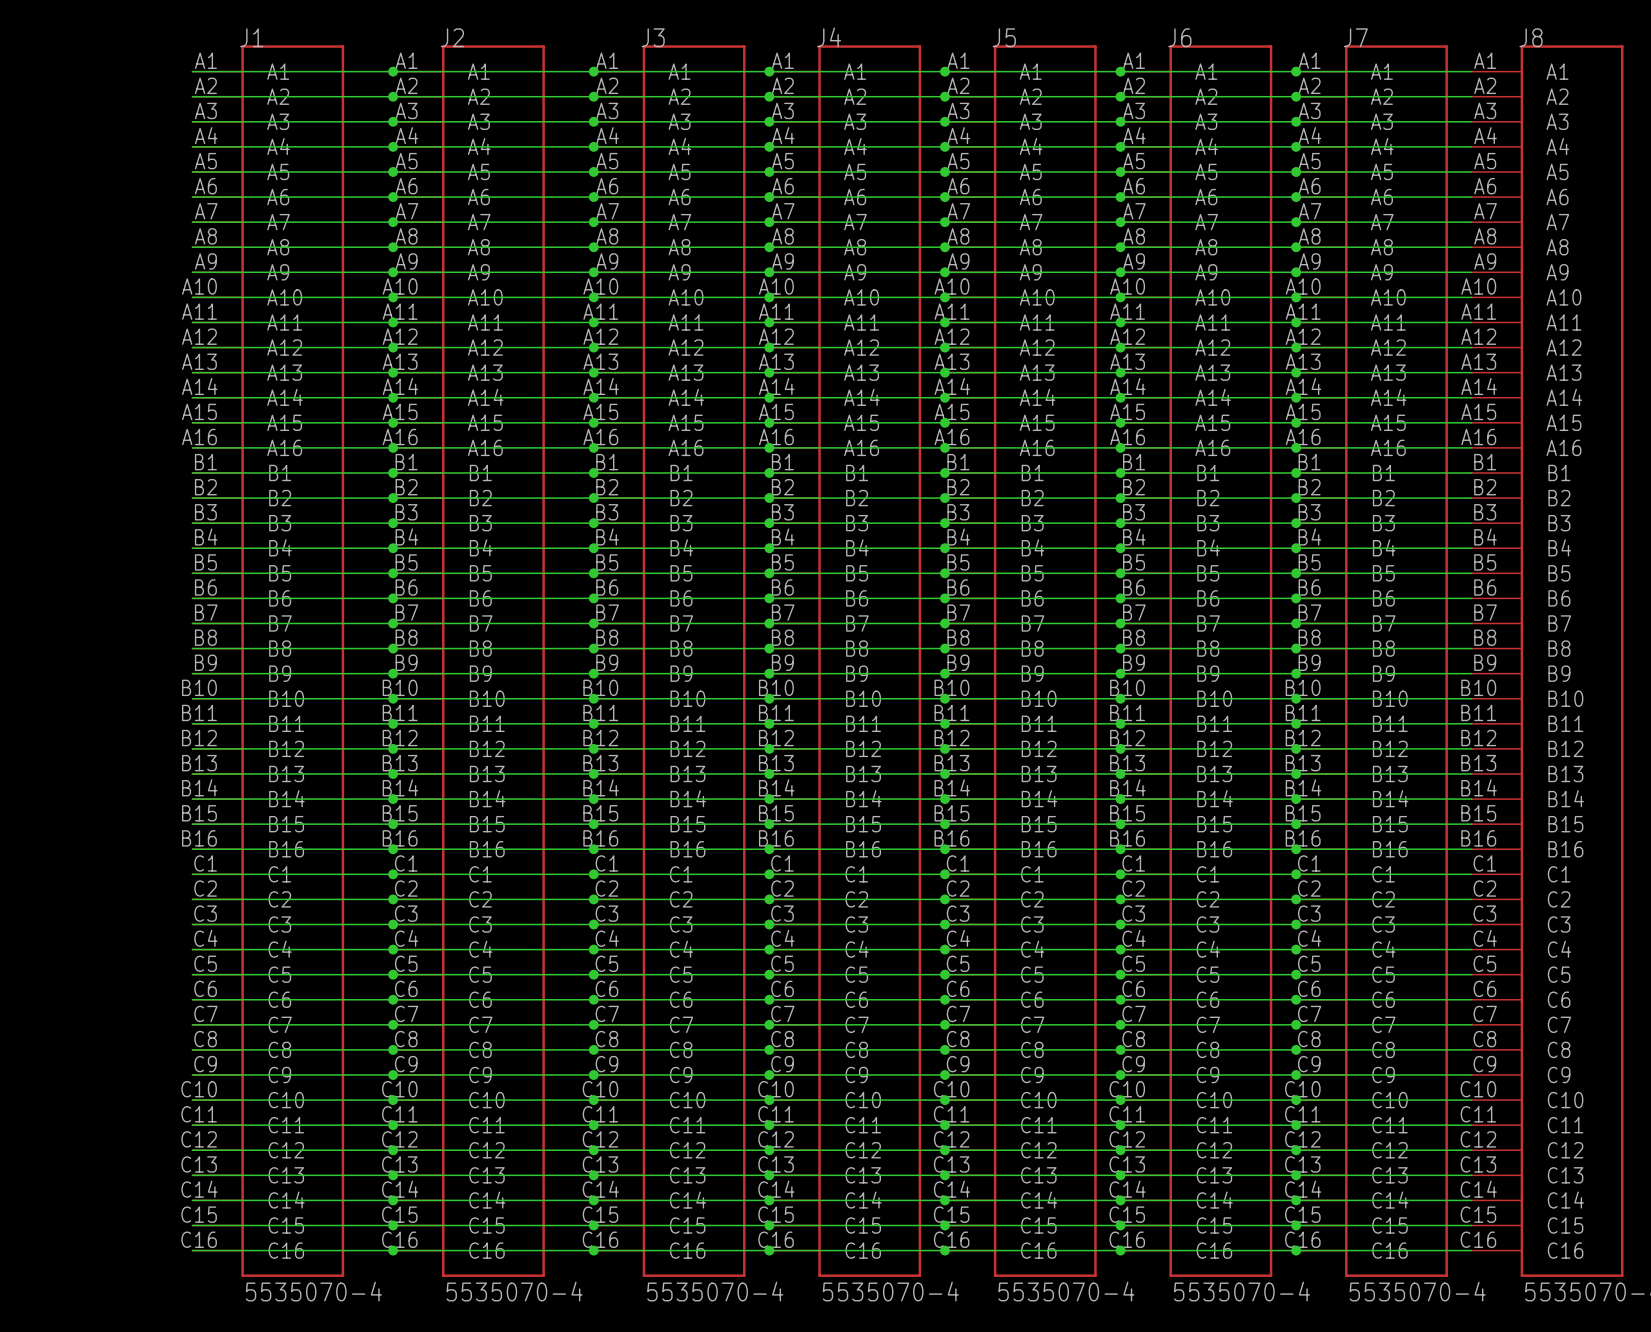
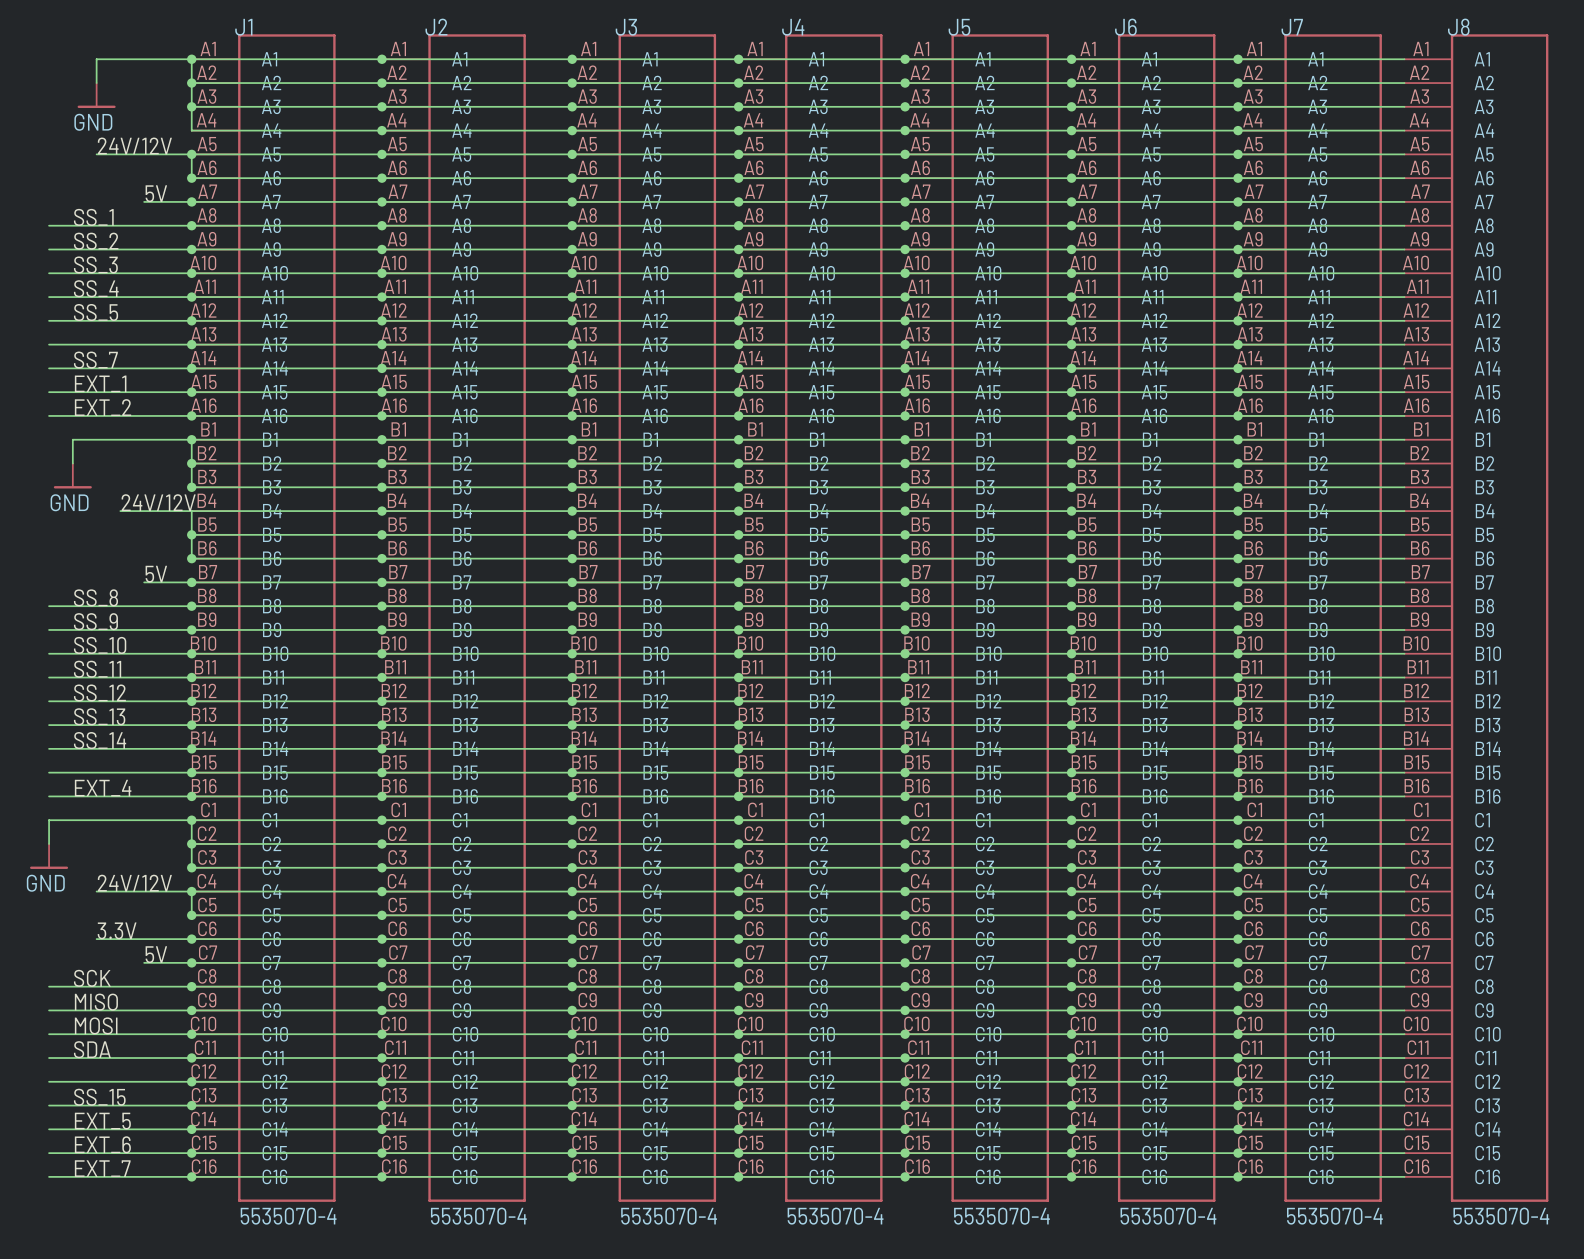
junction: none -> (191, 59)
wire: none -> (96, 83) (96, 59) (191, 59) (191, 130)
junction: none -> (191, 83)
power symbol: none -> GND (96, 95)
junction: none -> (191, 106)
label: none -> 24V/12V (134, 145)
wire: none -> (96, 154) (191, 154) (191, 178)
junction: none -> (191, 154)
junction: none -> (191, 178)
label: none -> 5V (156, 193)
wire: none -> (144, 201) (191, 201)
junction: none -> (191, 201)
label: none -> SS_1 (93, 217)
wire: none -> (49, 225) (191, 225)
junction: none -> (191, 225)
label: none -> SS_2 (96, 241)
wire: none -> (49, 249) (191, 249)
junction: none -> (191, 249)
label: none -> SS_3 (95, 264)
wire: none -> (49, 273) (191, 273)
junction: none -> (191, 273)
label: none -> SS_4 (96, 288)
wire: none -> (49, 297) (191, 297)
junction: none -> (191, 297)
label: none -> SS_5 (96, 312)
wire: none -> (49, 320) (191, 320)
junction: none -> (191, 320)
wire: none -> (49, 344) (191, 344)
junction: none -> (191, 344)
label: none -> SS_7 (95, 360)
wire: none -> (49, 368) (191, 368)
junction: none -> (191, 368)
label: none -> EXT_1 (100, 383)
wire: none -> (49, 392) (191, 392)
junction: none -> (191, 392)
label: none -> EXT_2 (103, 407)
wire: none -> (49, 415) (191, 415)
junction: none -> (191, 415)
junction: none -> (191, 439)
wire: none -> (72, 463) (72, 439) (191, 439) (191, 487)
junction: none -> (191, 463)
power symbol: none -> GND (72, 476)
junction: none -> (191, 487)
label: none -> 24V/12V (158, 502)
wire: none -> (120, 511) (191, 511) (191, 558)
junction: none -> (191, 534)
junction: none -> (191, 558)
label: none -> 5V (156, 574)
wire: none -> (144, 582) (191, 582)
junction: none -> (191, 582)
label: none -> SS_8 (95, 597)
wire: none -> (49, 606) (191, 606)
junction: none -> (191, 606)
label: none -> SS_9 (95, 621)
wire: none -> (49, 629) (191, 629)
junction: none -> (191, 629)
label: none -> SS_10 (100, 645)
wire: none -> (49, 653) (191, 653)
junction: none -> (191, 653)
label: none -> SS_11 (97, 669)
wire: none -> (49, 677) (191, 677)
junction: none -> (191, 677)
label: none -> SS_12 (99, 692)
wire: none -> (49, 701) (191, 701)
junction: none -> (191, 701)
label: none -> SS_13 (99, 716)
wire: none -> (49, 725) (191, 725)
junction: none -> (191, 725)
label: none -> SS_14 (100, 740)
wire: none -> (49, 748) (191, 748)
junction: none -> (191, 748)
wire: none -> (49, 772) (191, 772)
junction: none -> (191, 772)
label: none -> EXT_4 (103, 788)
wire: none -> (49, 796) (191, 796)
junction: none -> (191, 796)
junction: none -> (191, 820)
wire: none -> (49, 843) (49, 820) (191, 820) (191, 867)
junction: none -> (191, 843)
power symbol: none -> GND (49, 856)
junction: none -> (191, 867)
label: none -> 24V/12V (134, 883)
wire: none -> (96, 891) (191, 891) (191, 915)
junction: none -> (191, 891)
junction: none -> (191, 915)
label: none -> 3.3V (117, 930)
wire: none -> (96, 939) (191, 939)
junction: none -> (191, 939)
label: none -> 5V (156, 954)
wire: none -> (144, 962) (191, 962)
junction: none -> (191, 962)
label: none -> SCK (92, 978)
wire: none -> (49, 986) (191, 986)
junction: none -> (191, 986)
label: none -> MISO (96, 1002)
wire: none -> (49, 1010) (191, 1010)
junction: none -> (191, 1010)
label: none -> MOSI (96, 1025)
wire: none -> (49, 1034) (191, 1034)
junction: none -> (191, 1034)
label: none -> SDA (92, 1049)
wire: none -> (49, 1058) (191, 1058)
junction: none -> (191, 1058)
wire: none -> (49, 1081) (191, 1081)
junction: none -> (191, 1081)
label: none -> SS_15 (99, 1097)
wire: none -> (49, 1105) (191, 1105)
junction: none -> (191, 1105)
label: none -> EXT_5 (102, 1121)
wire: none -> (49, 1129) (191, 1129)
junction: none -> (191, 1129)
label: none -> EXT_6 (102, 1144)
wire: none -> (49, 1153) (191, 1153)
junction: none -> (191, 1153)
label: none -> EXT_7 (102, 1168)
wire: none -> (49, 1176) (191, 1176)
junction: none -> (191, 1176)

